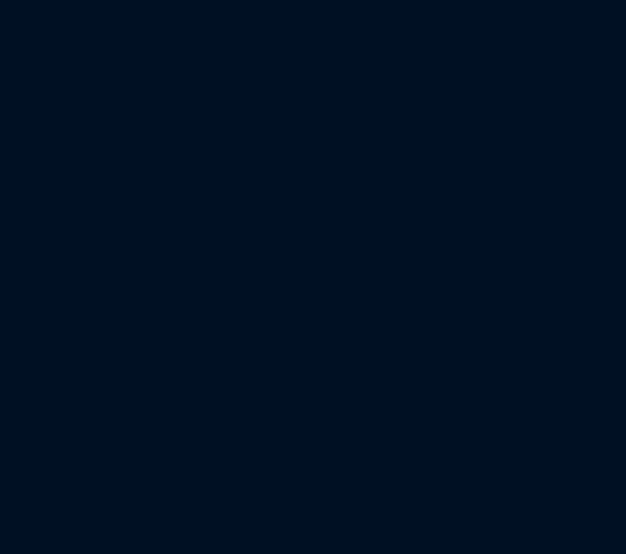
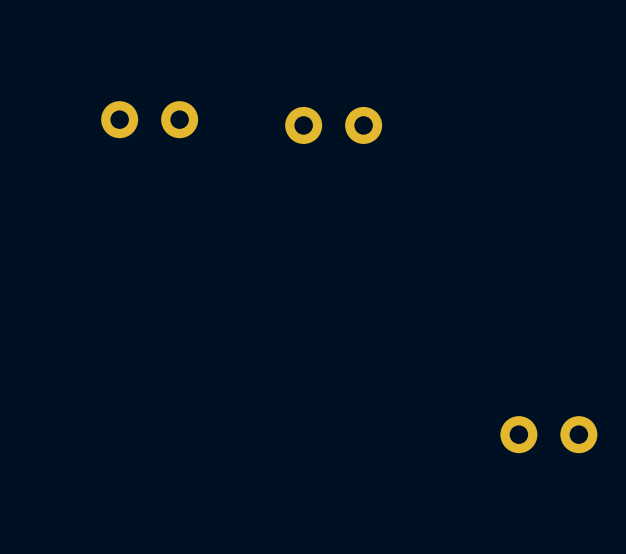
part: none -> (149, 119)
part: none -> (333, 125)
part: none -> (548, 434)

